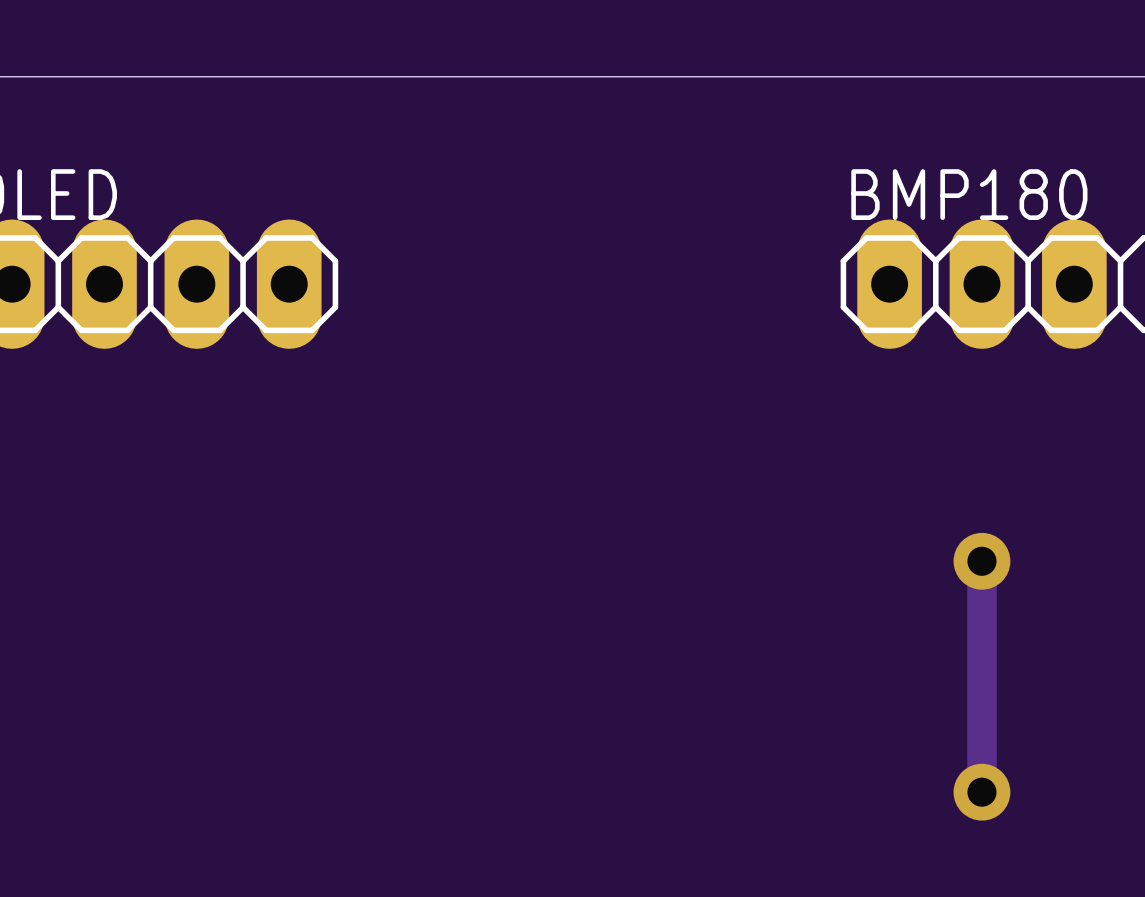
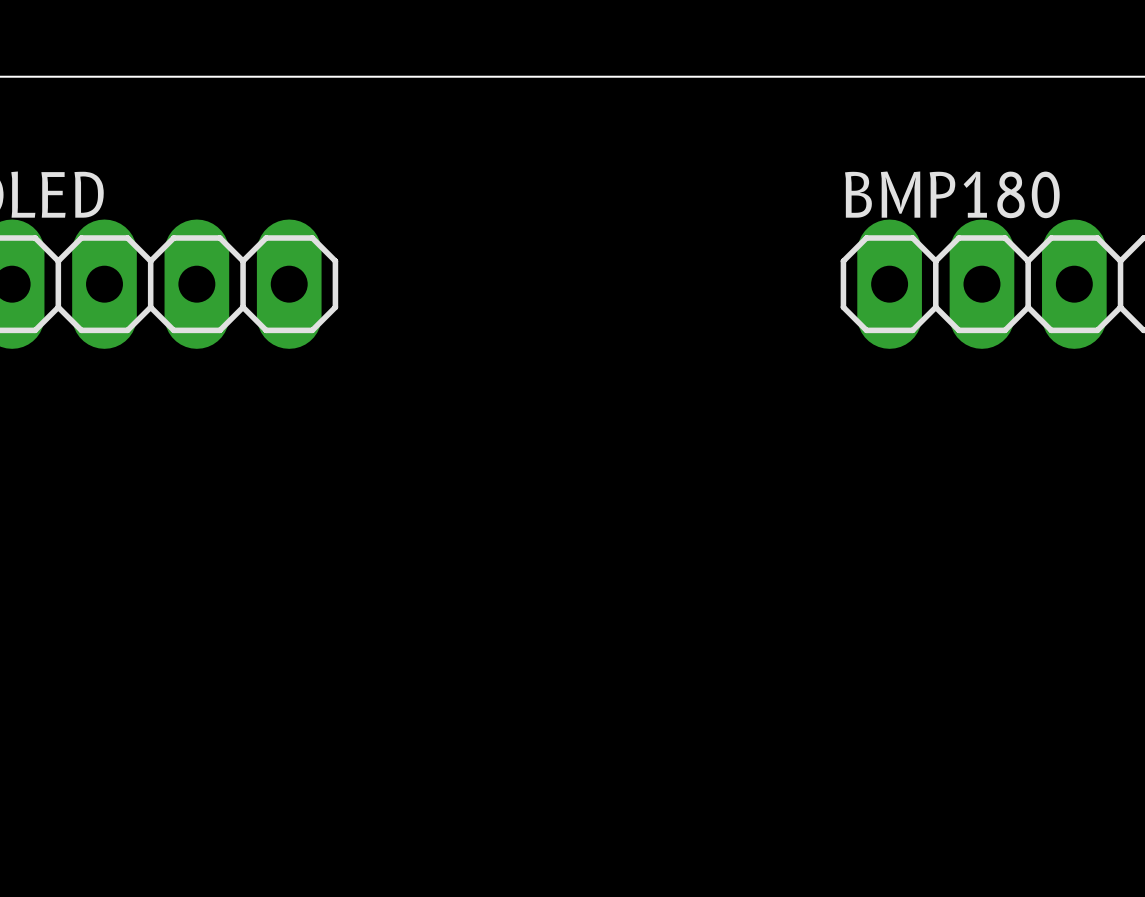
track: (981, 561) (981, 792) -> none
via: (981, 561) -> none
via: (981, 792) -> none

